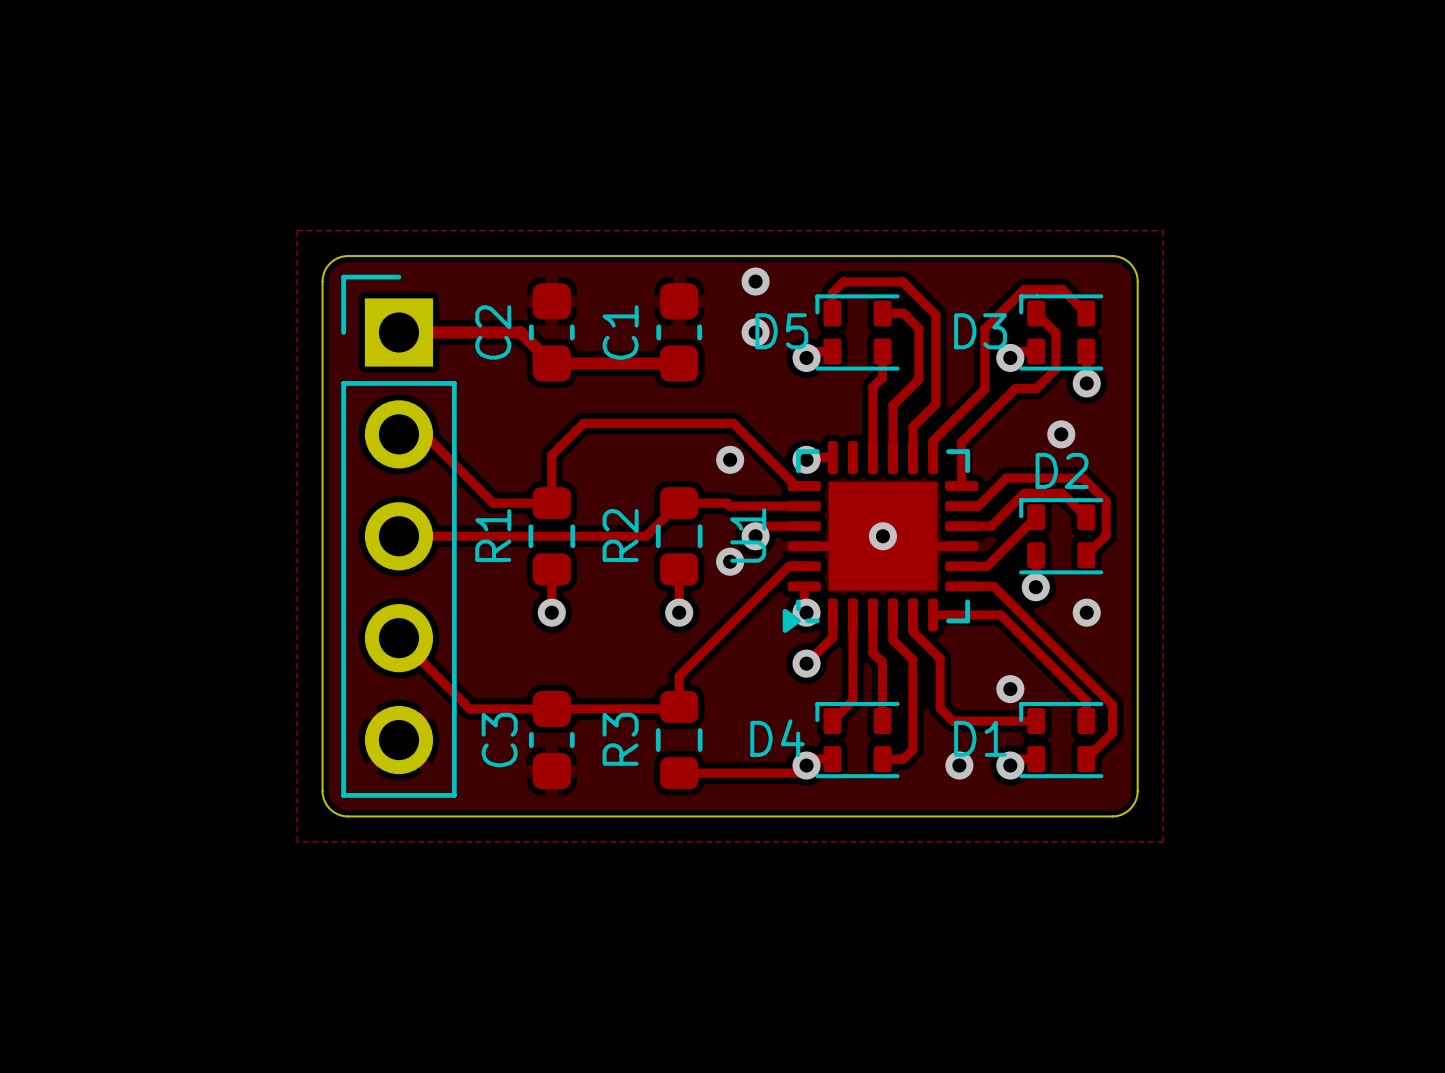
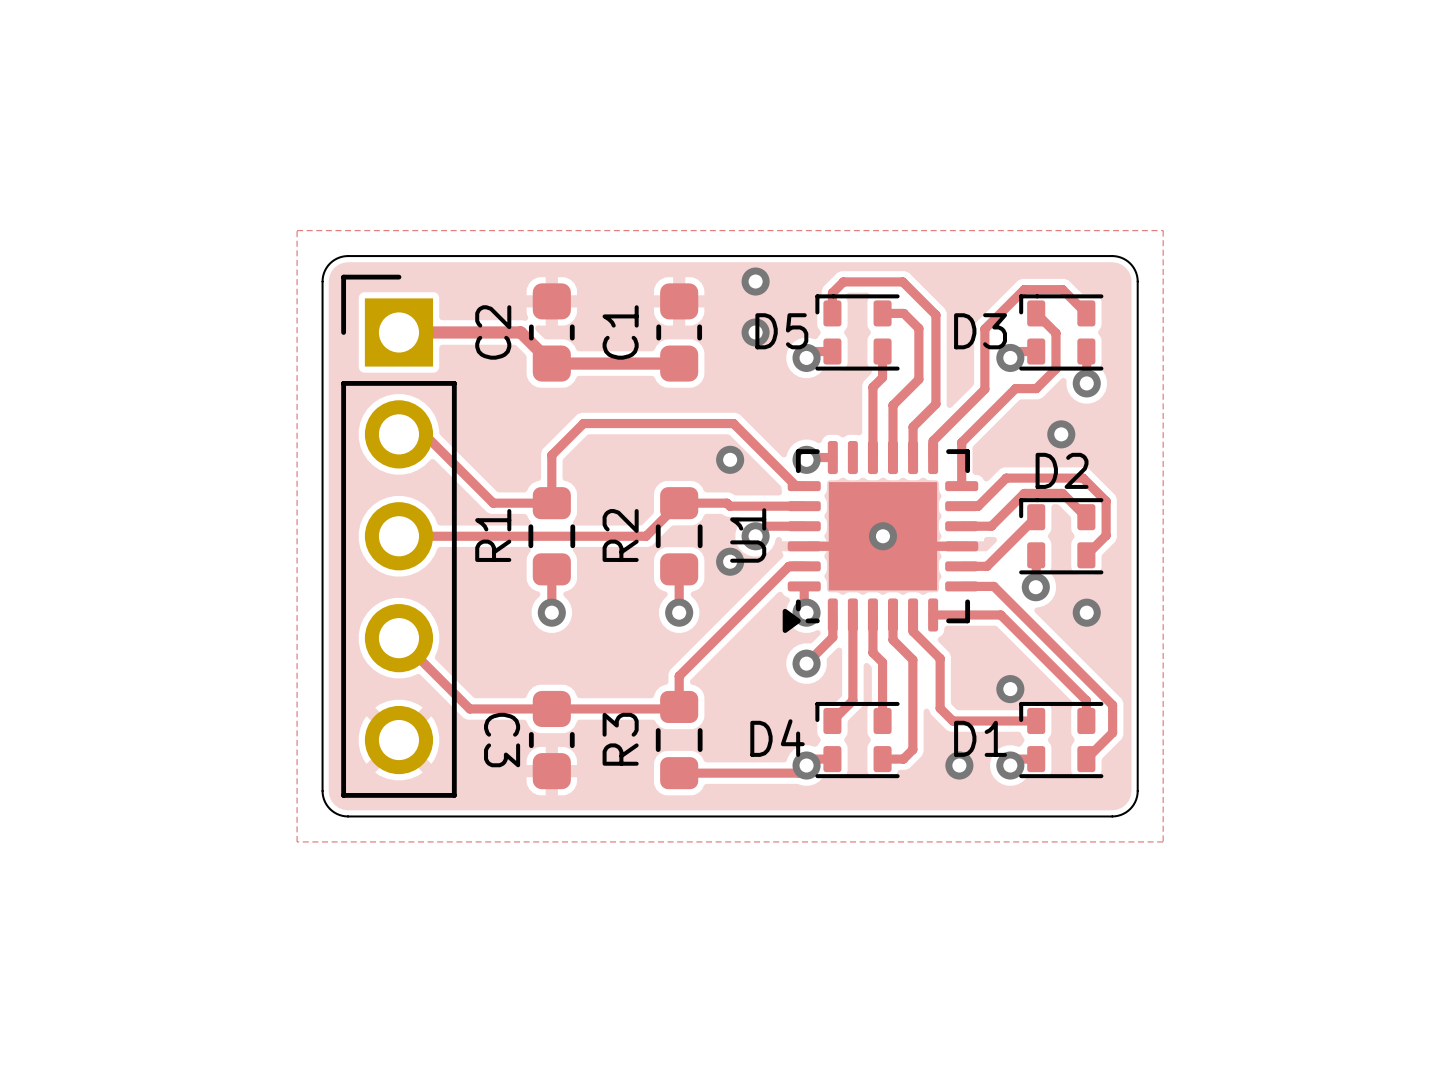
C3 name rotation: 0° (499, 740) -> 180° (502, 740)

